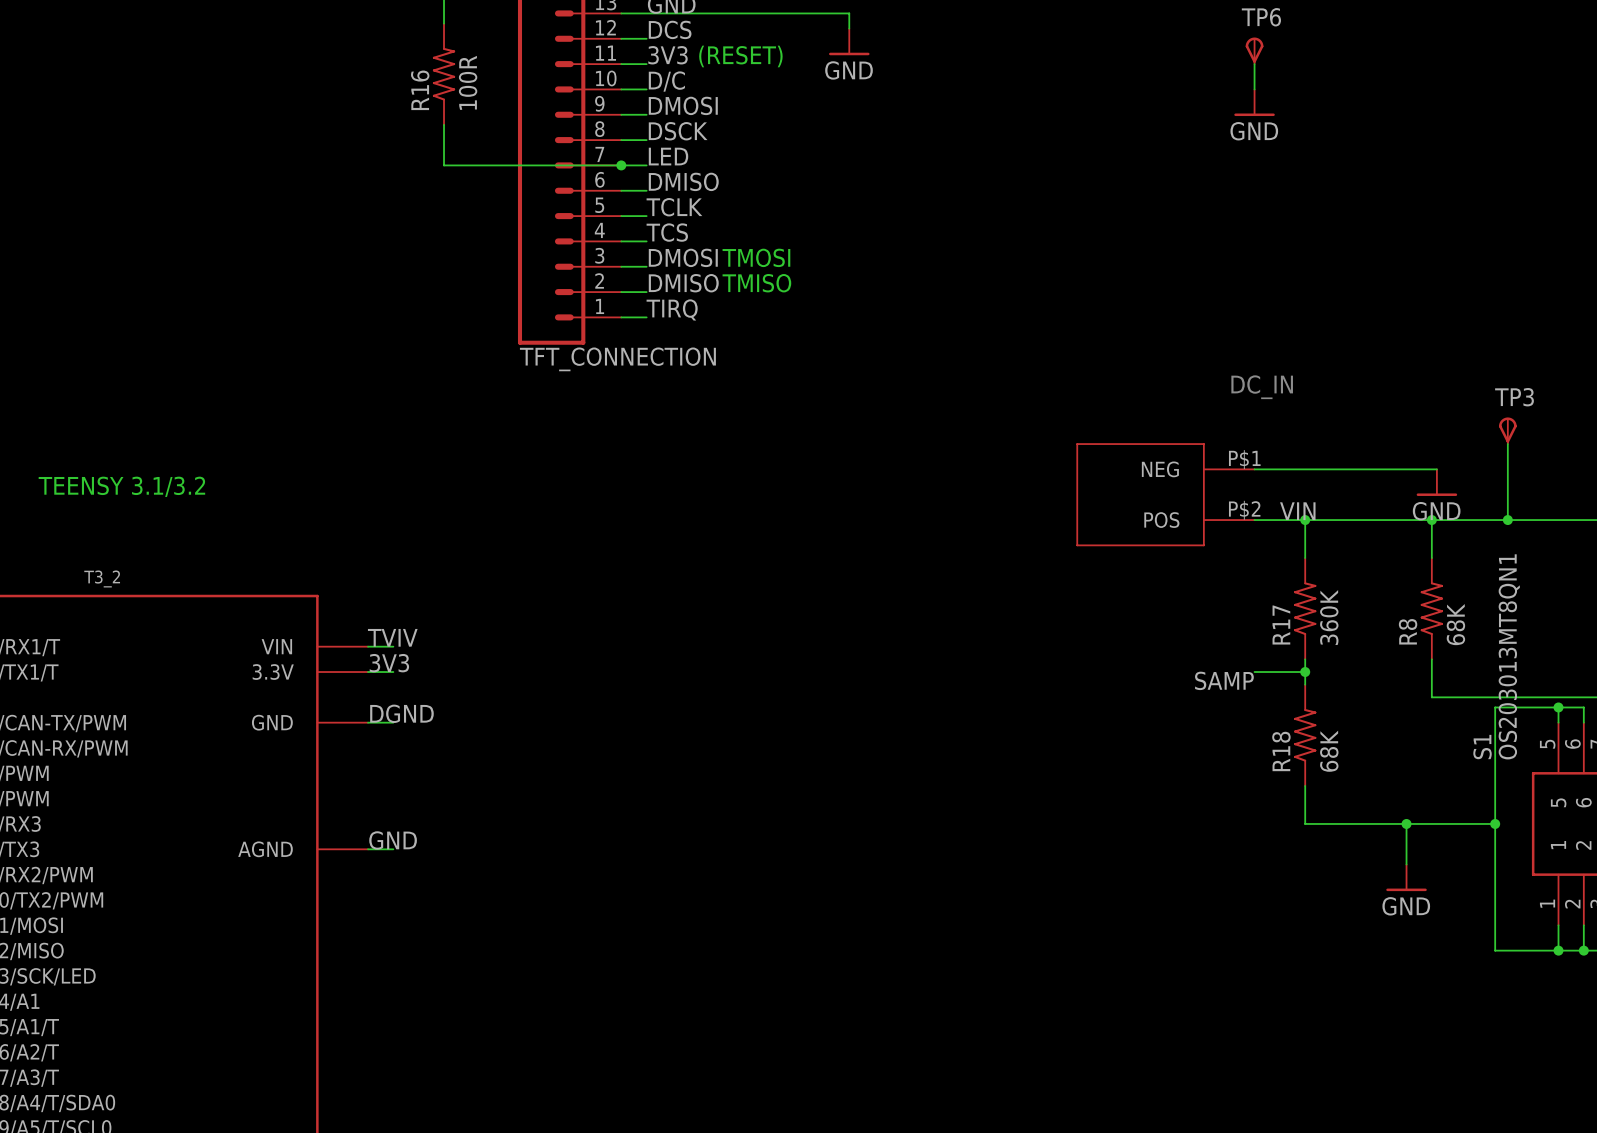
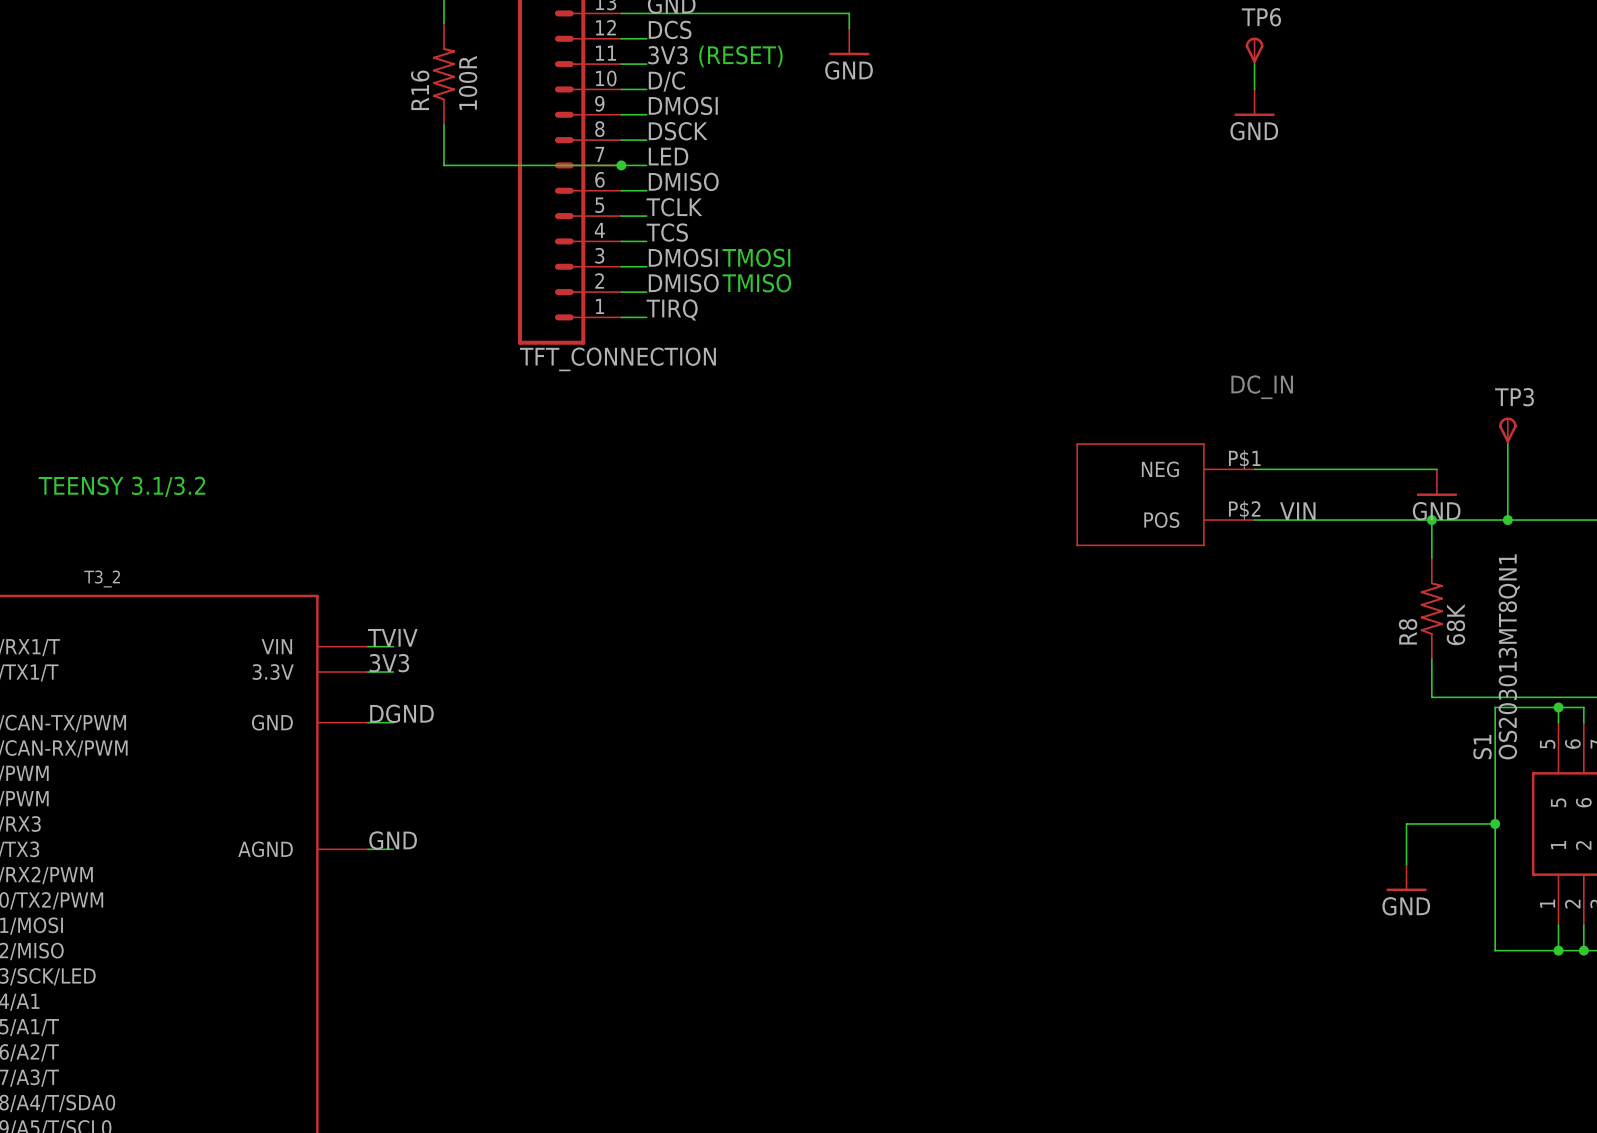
wire: (1305, 520) (1305, 558) -> none
junction: (1305, 520) -> none
R17: 360K (1305, 608) -> none
wire: (1305, 659) (1305, 684) -> none
wire: (1254, 672) (1305, 672) -> none
junction: (1305, 672) -> none
label: SAMP (1224, 680) -> none
R18: 68K (1305, 735) -> none
wire: (1305, 785) (1305, 823) (1406, 823) -> none
junction: (1406, 823) -> none

